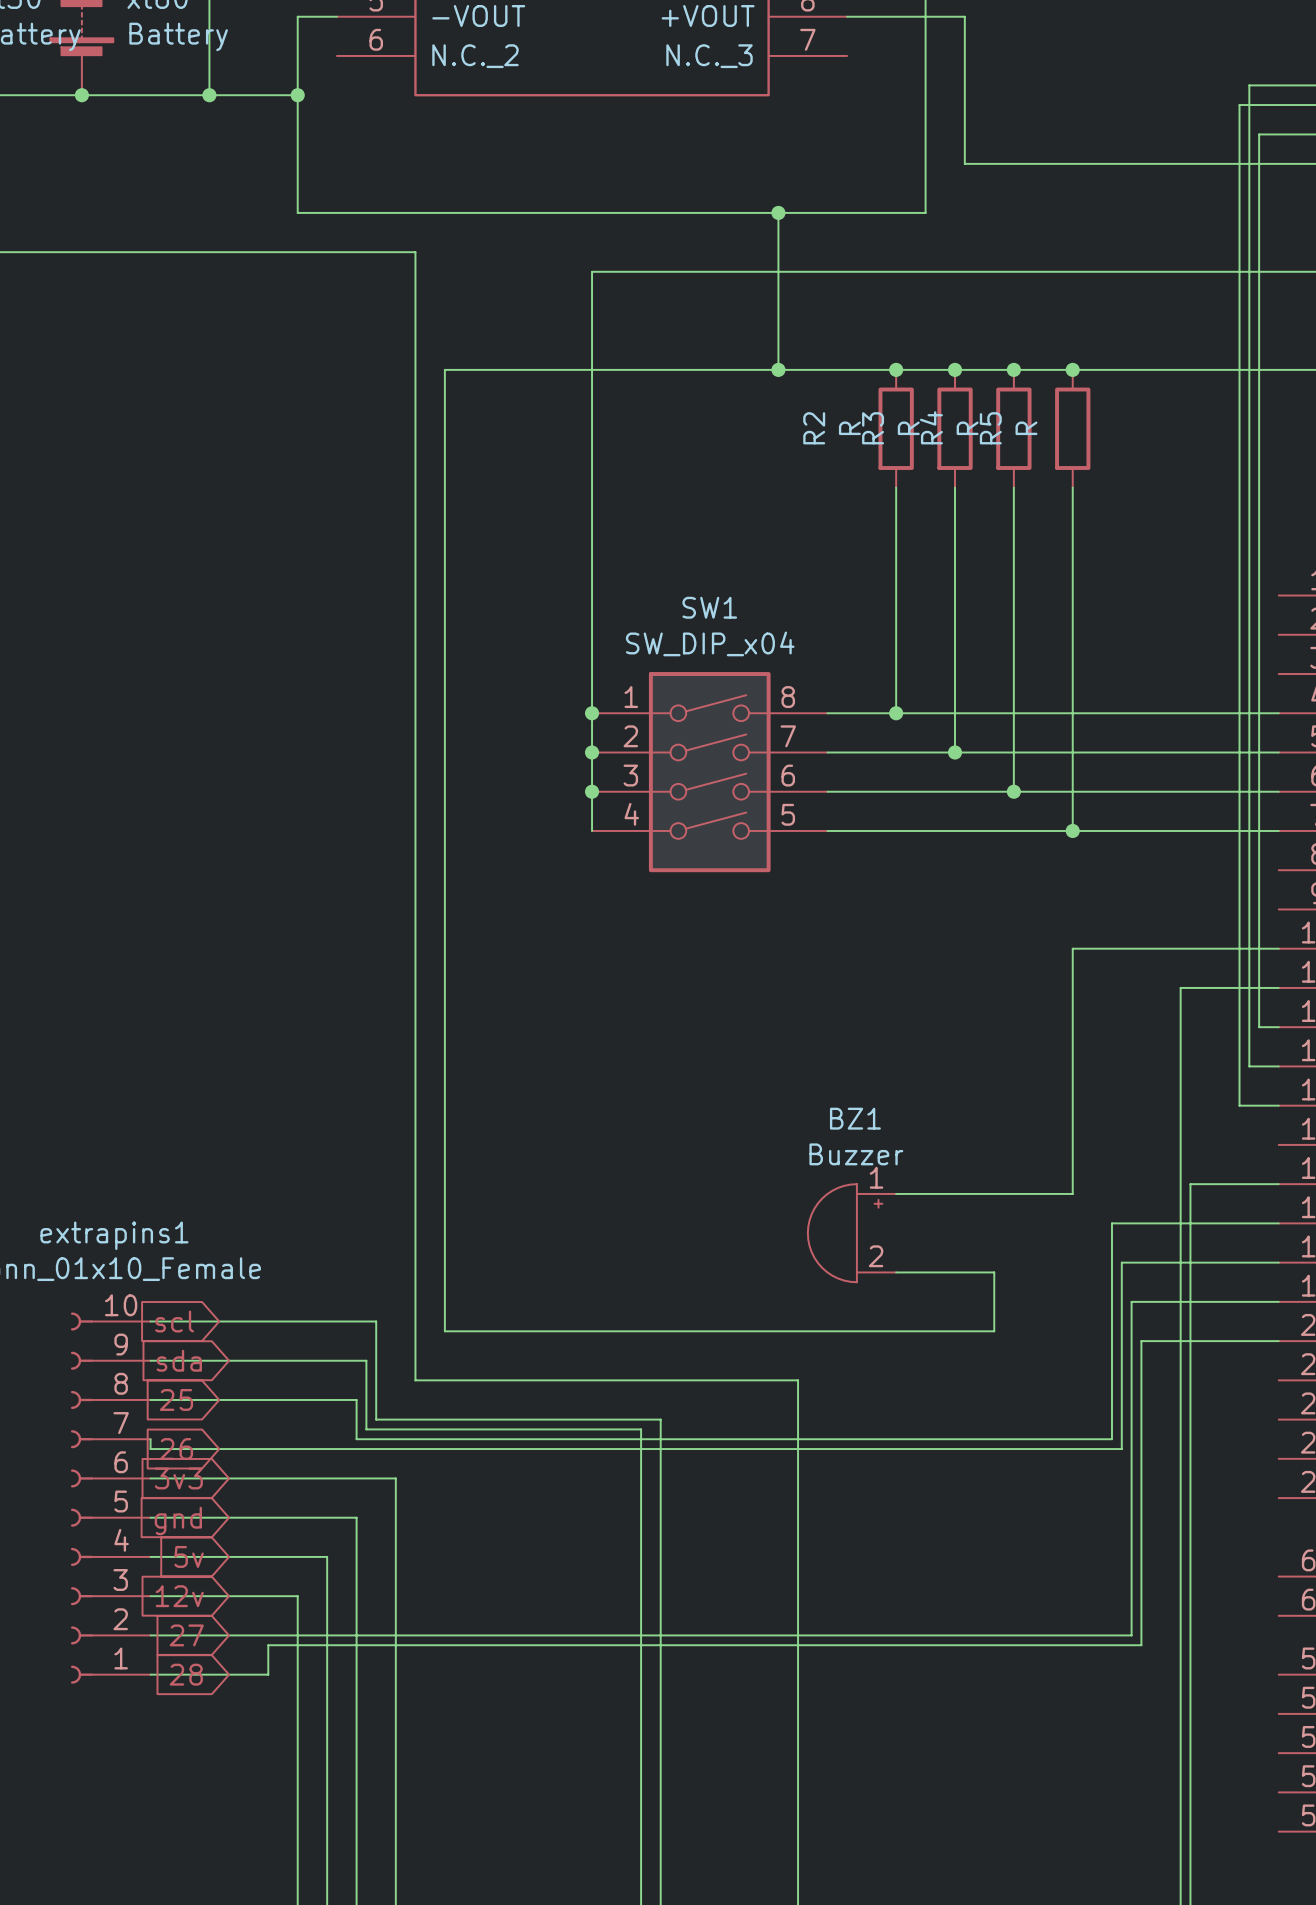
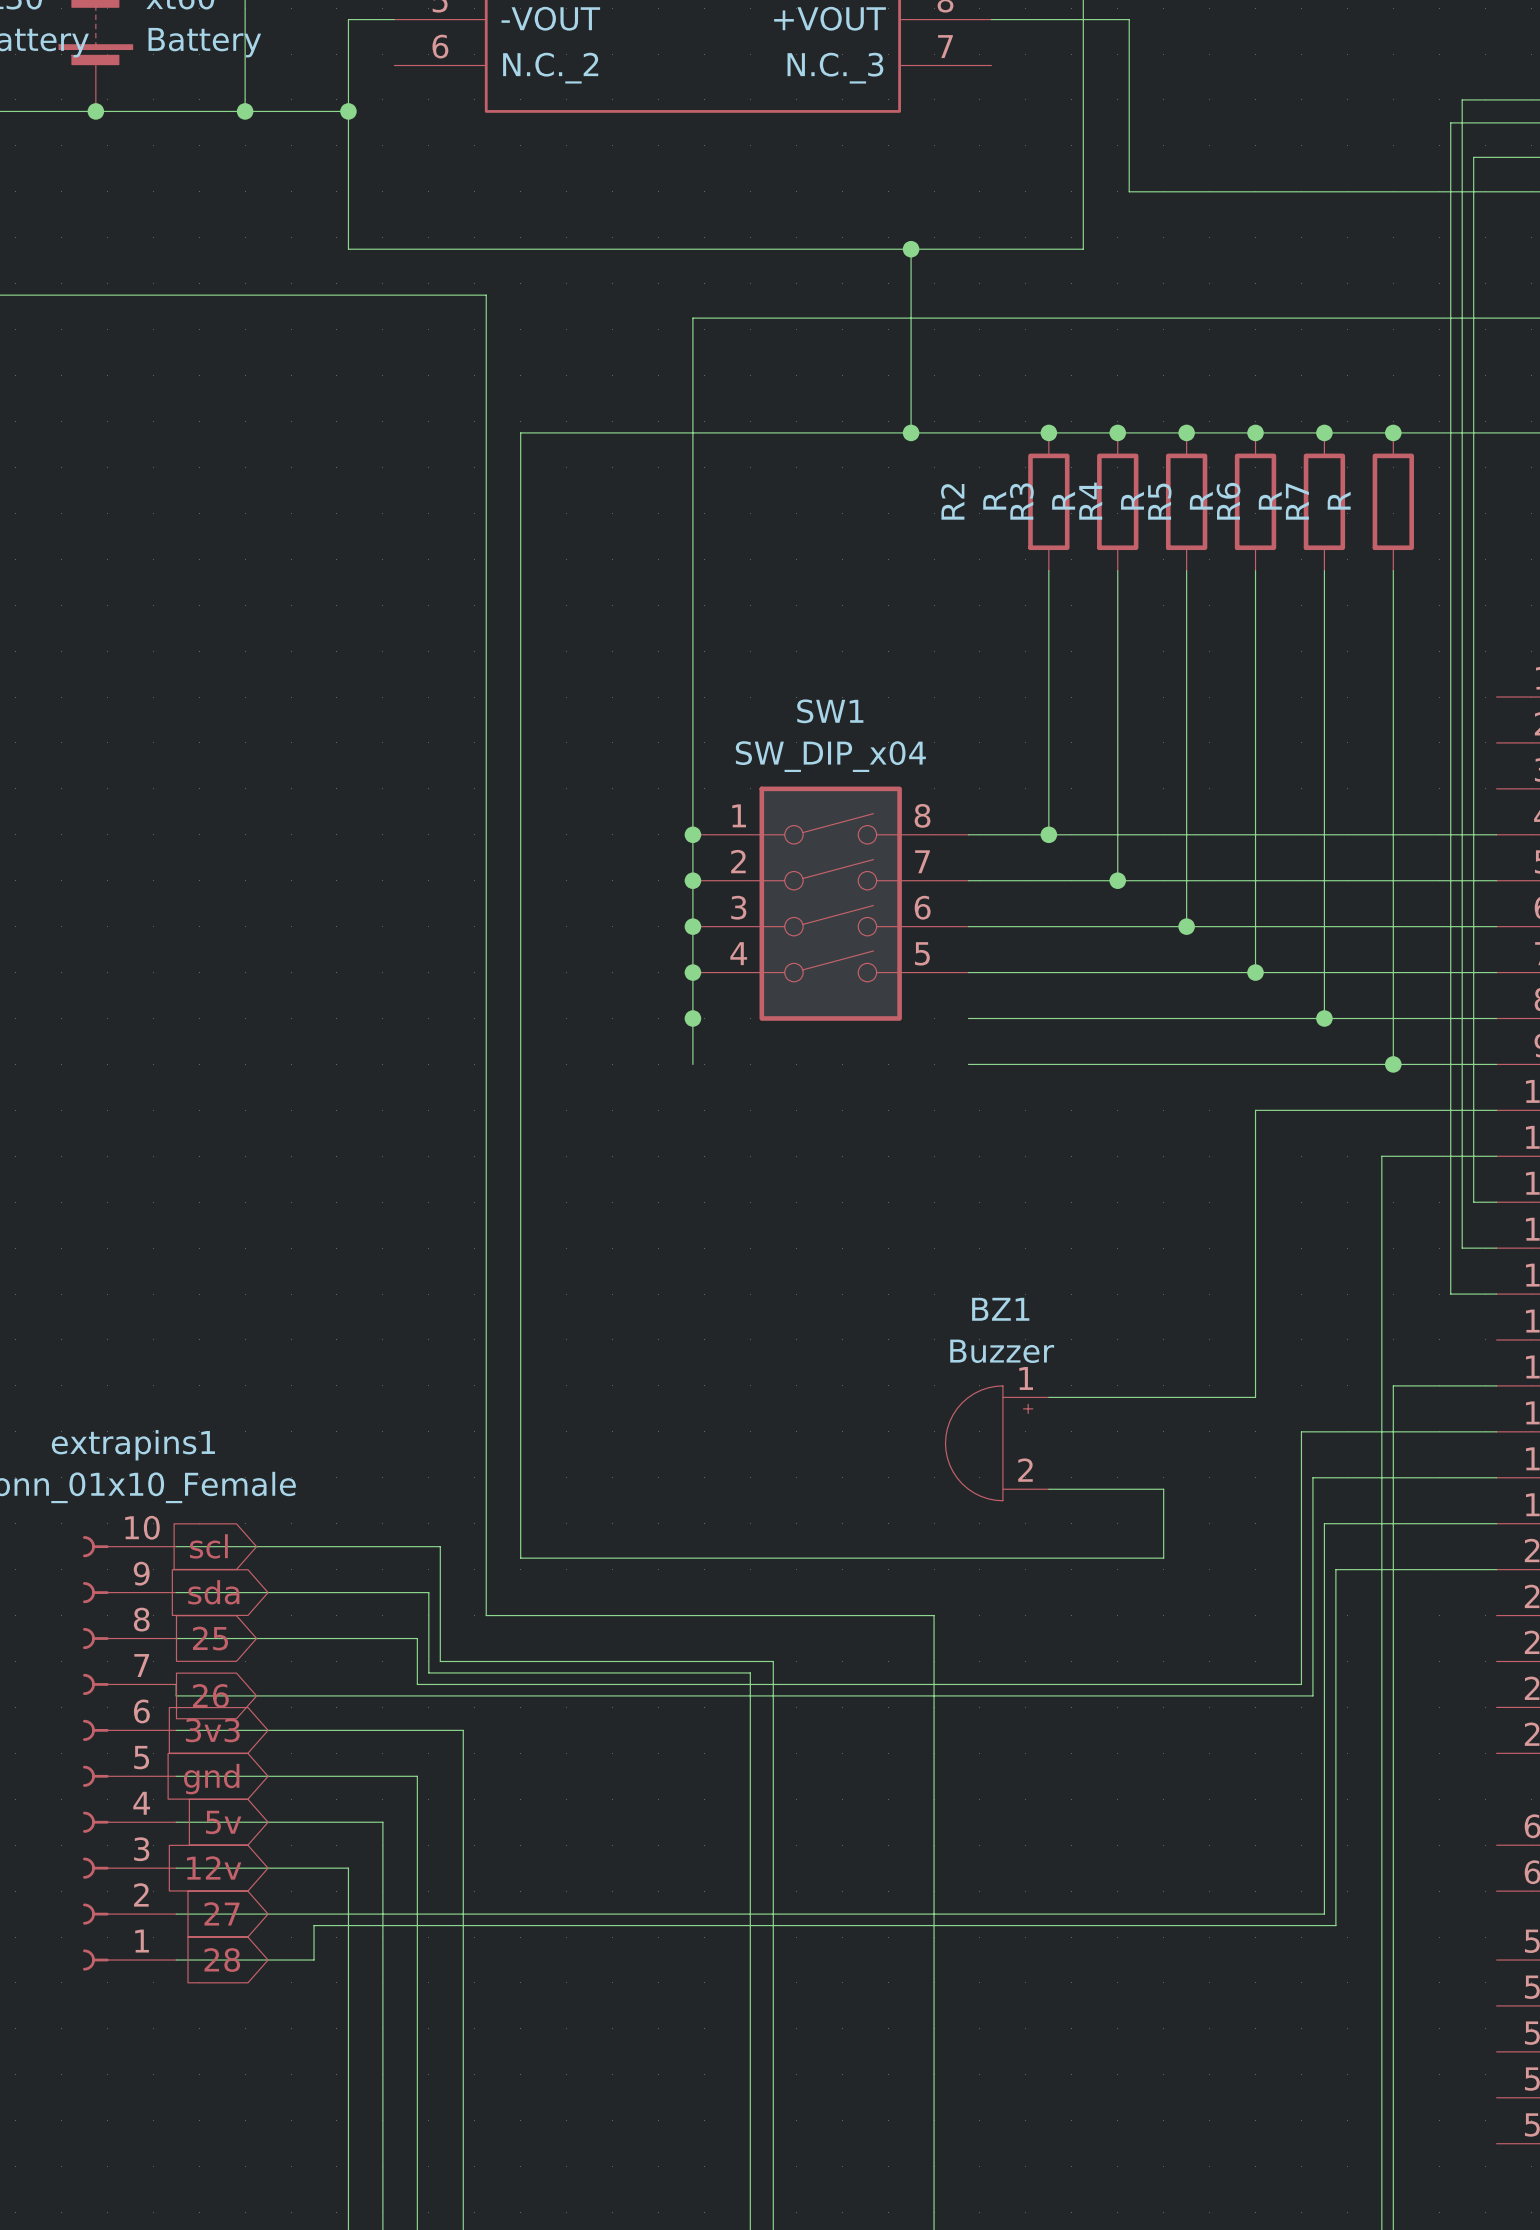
junction: none -> (1324, 432)
junction: none -> (1393, 432)
R6: none -> R (1324, 501)
R7: none -> R (1393, 501)
wire: none -> (1324, 570) (1324, 1018)
wire: none -> (1393, 570) (1393, 1064)
wire: none -> (692, 972) (692, 1064)
junction: none -> (692, 972)
junction: none -> (692, 1018)
wire: none -> (968, 1018) (1496, 1018)
junction: none -> (1324, 1018)
wire: none -> (968, 1064) (1496, 1064)
junction: none -> (1393, 1064)

